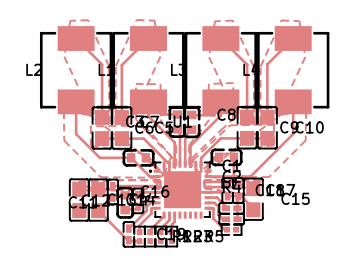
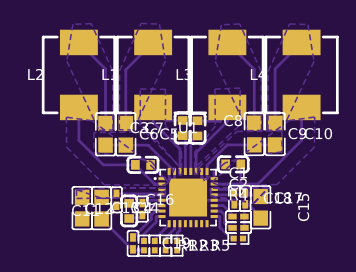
C15 name rotation: 0° (295, 198) -> 90° counterclockwise (303, 207)

